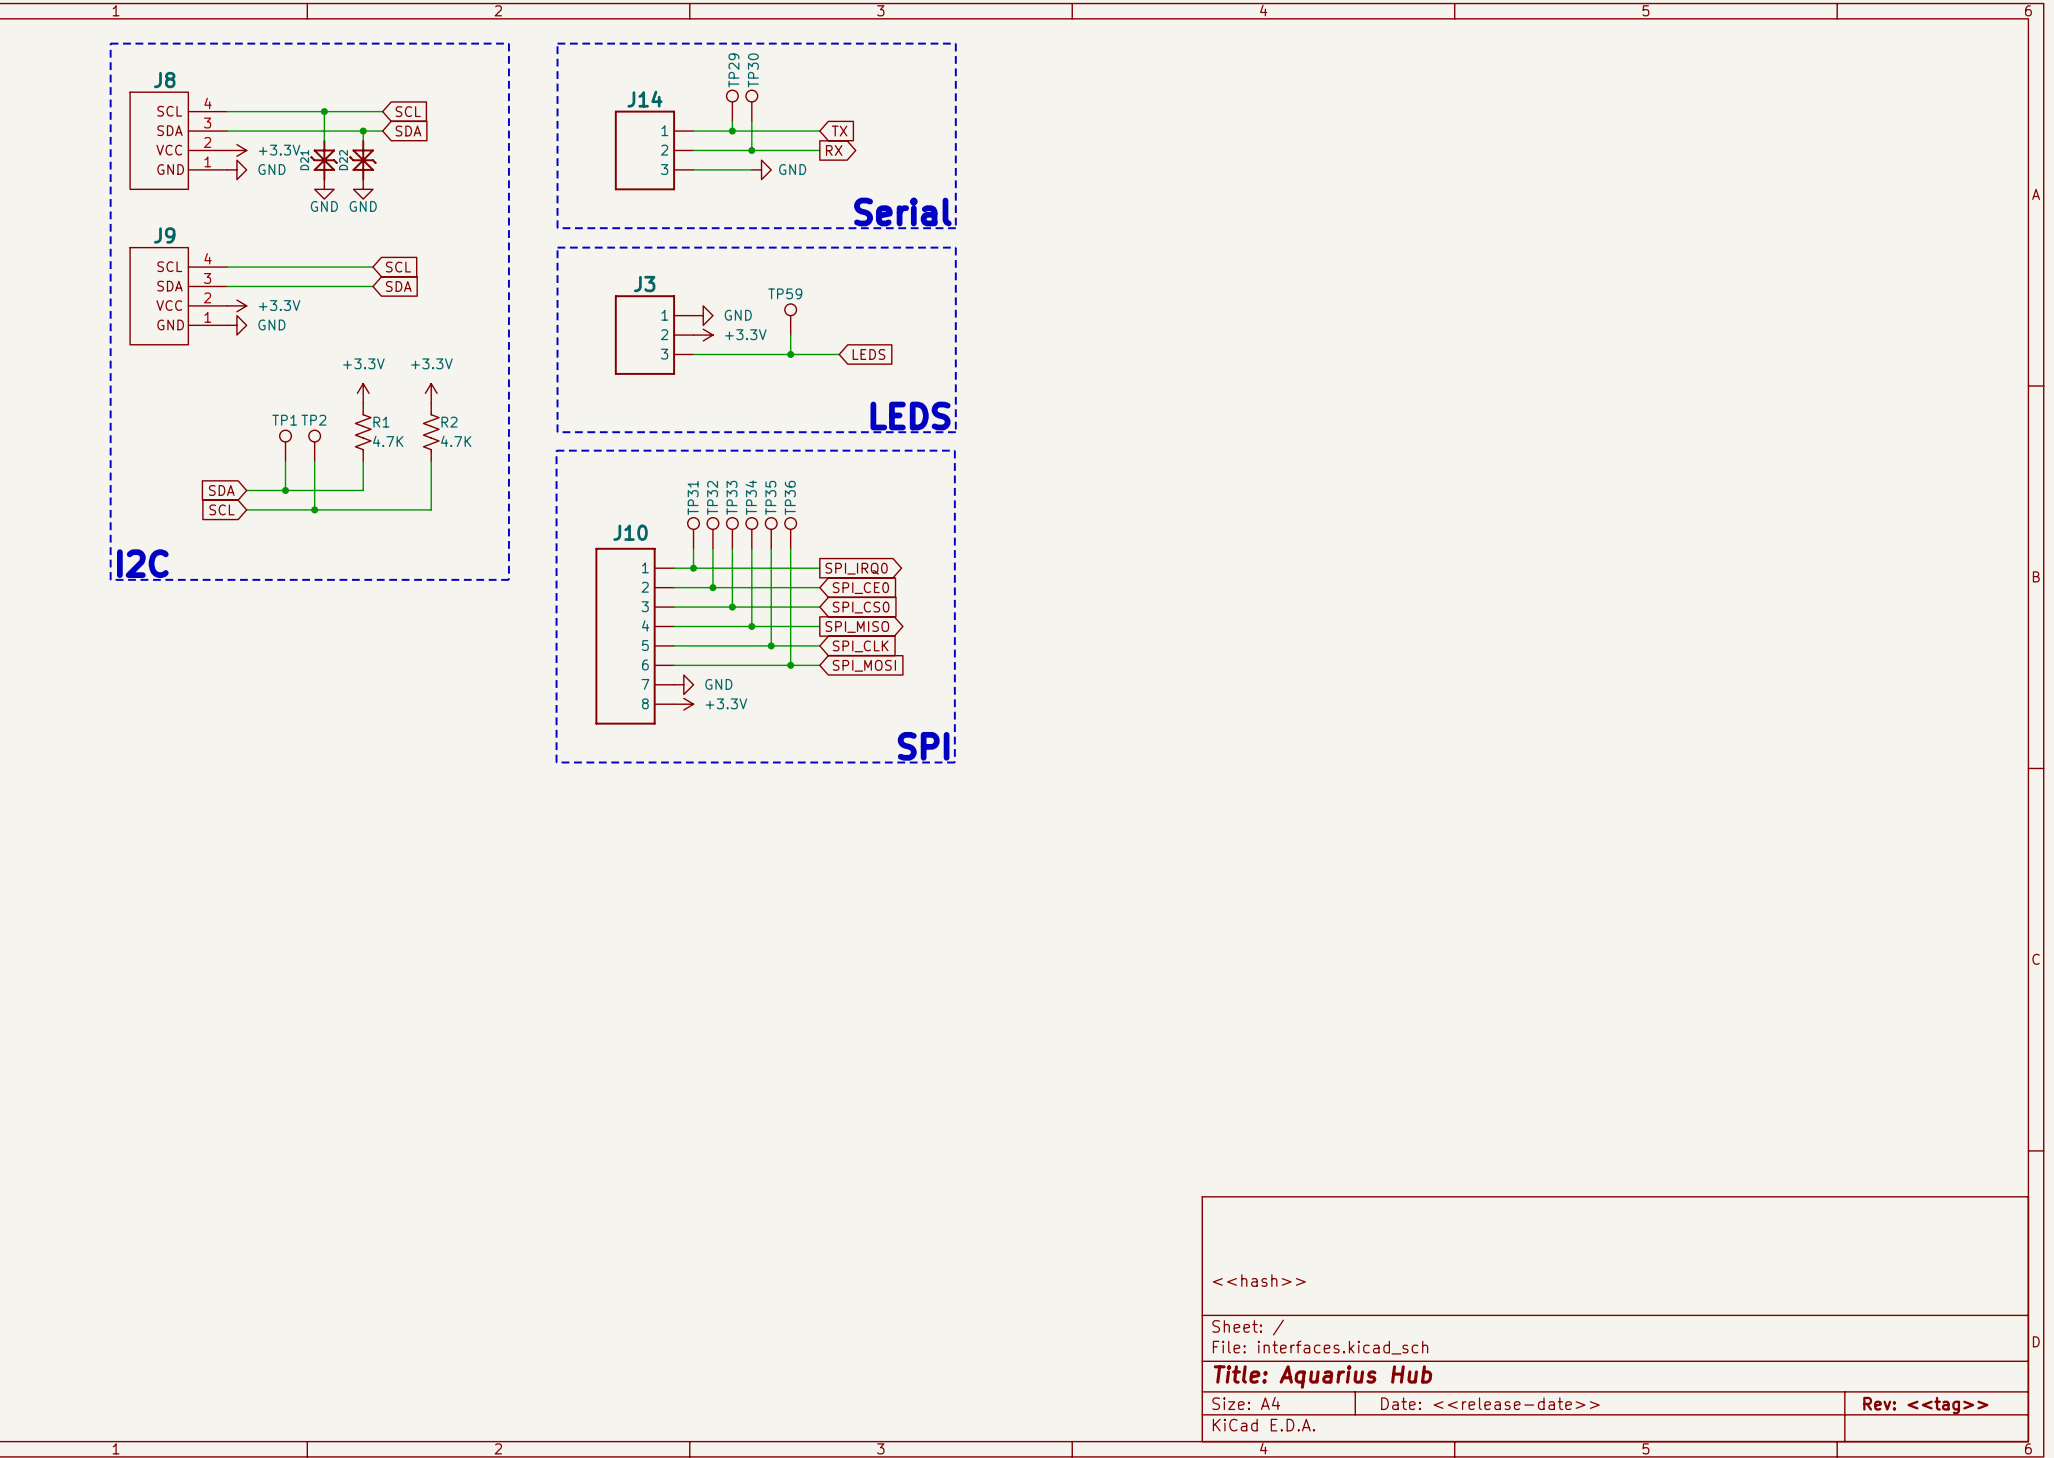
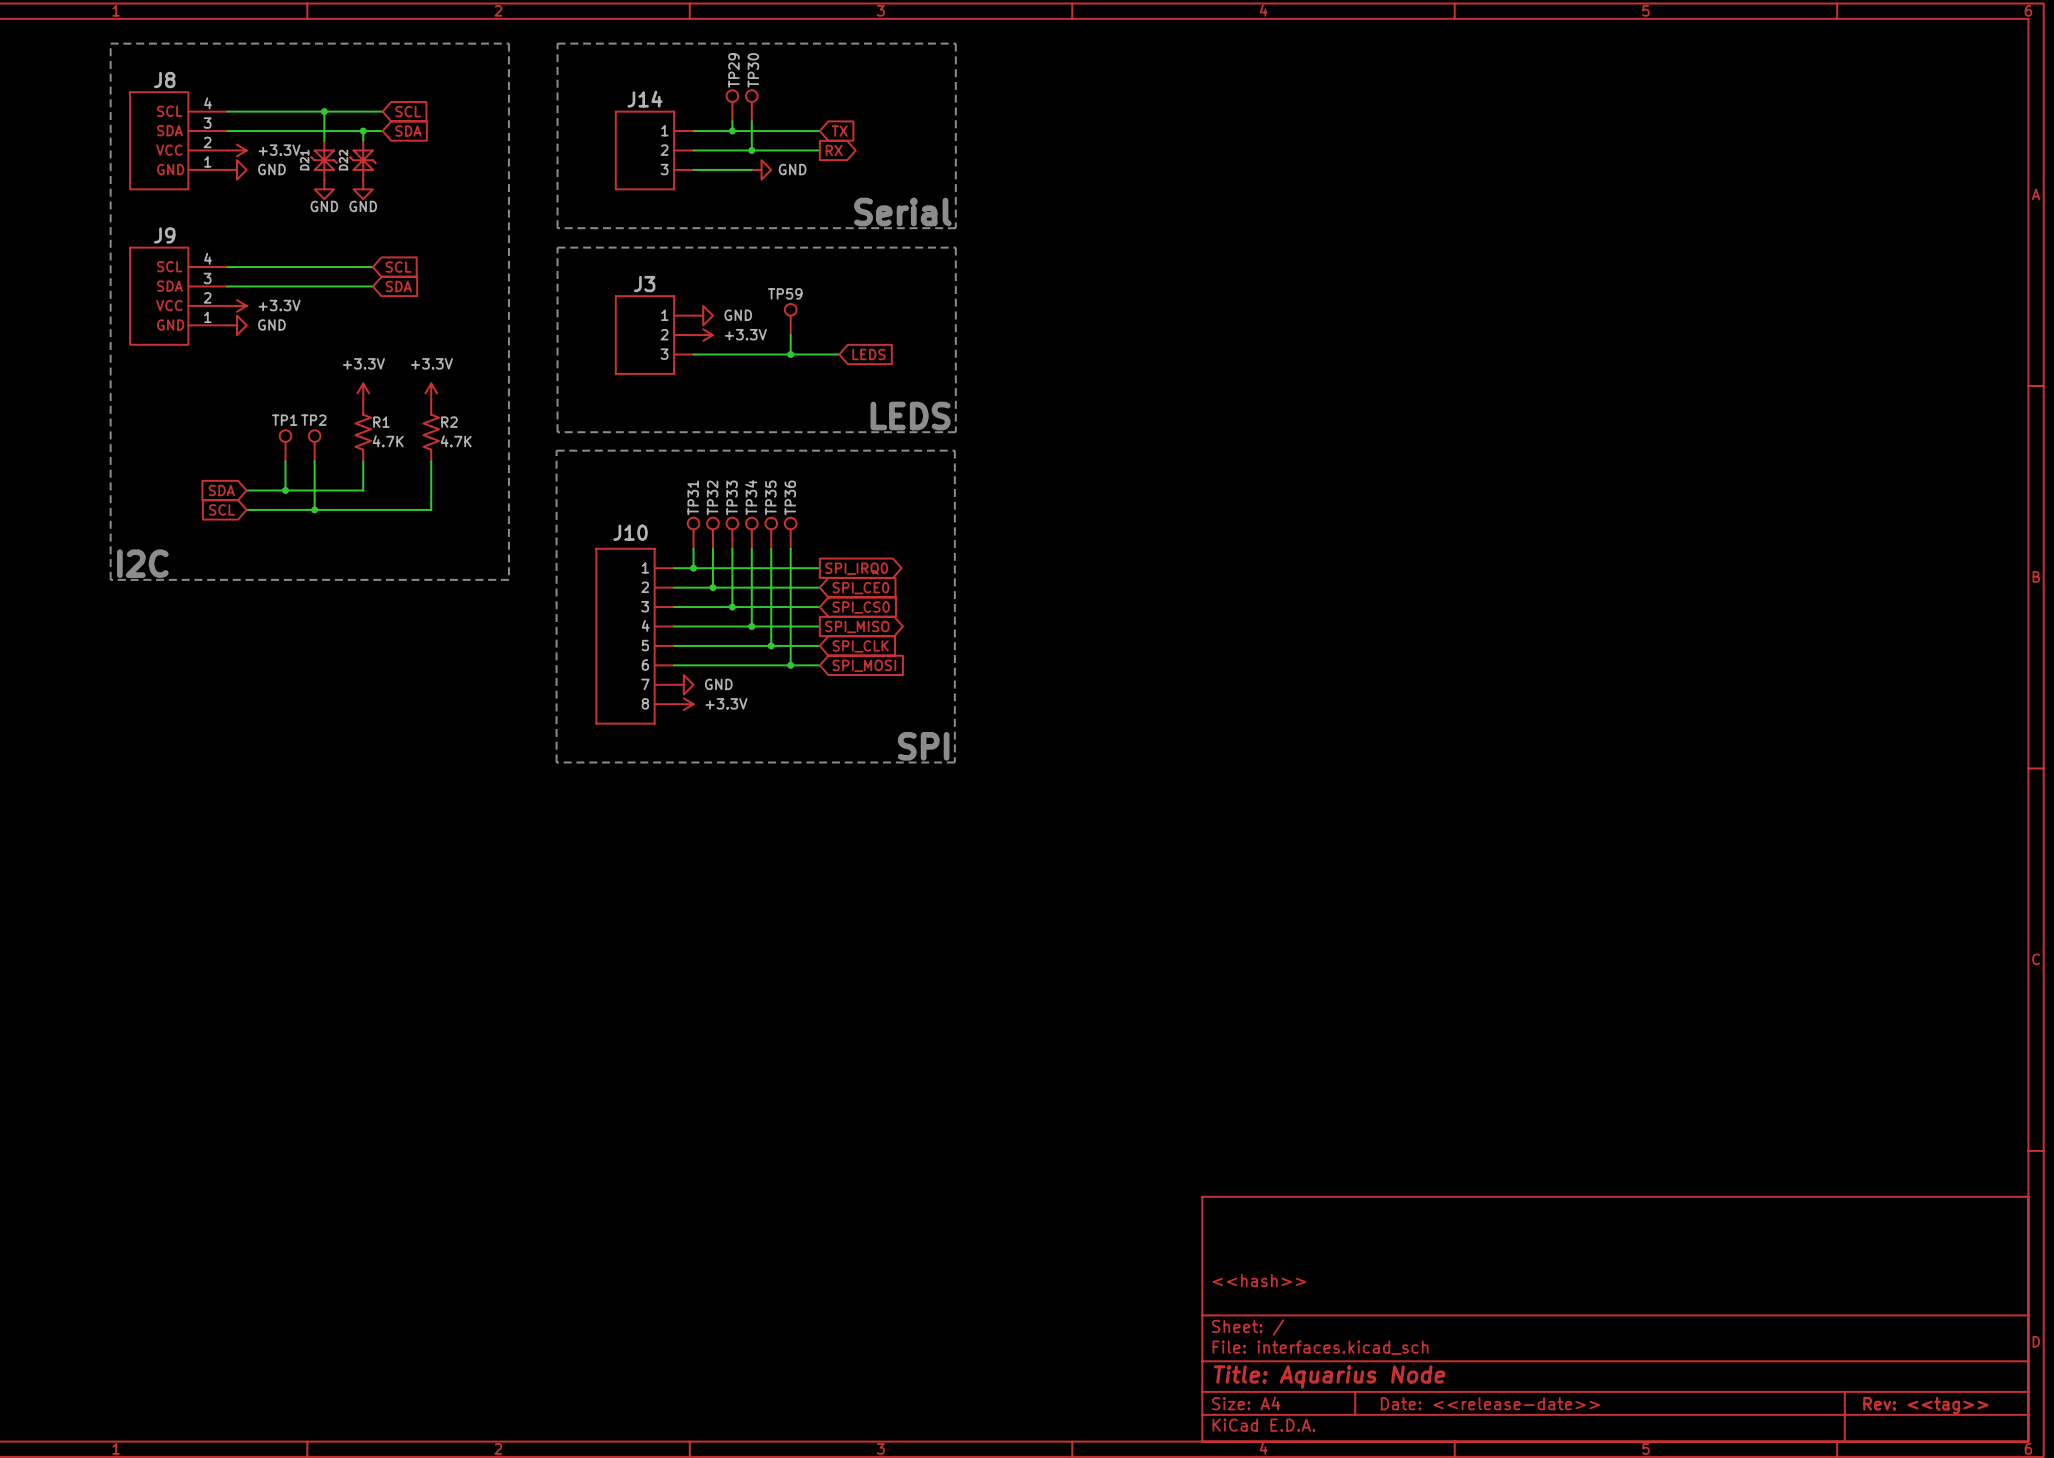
title block: Title: Aquarius Hub (1323, 1377) -> Title: Aquarius Node (1329, 1377)

